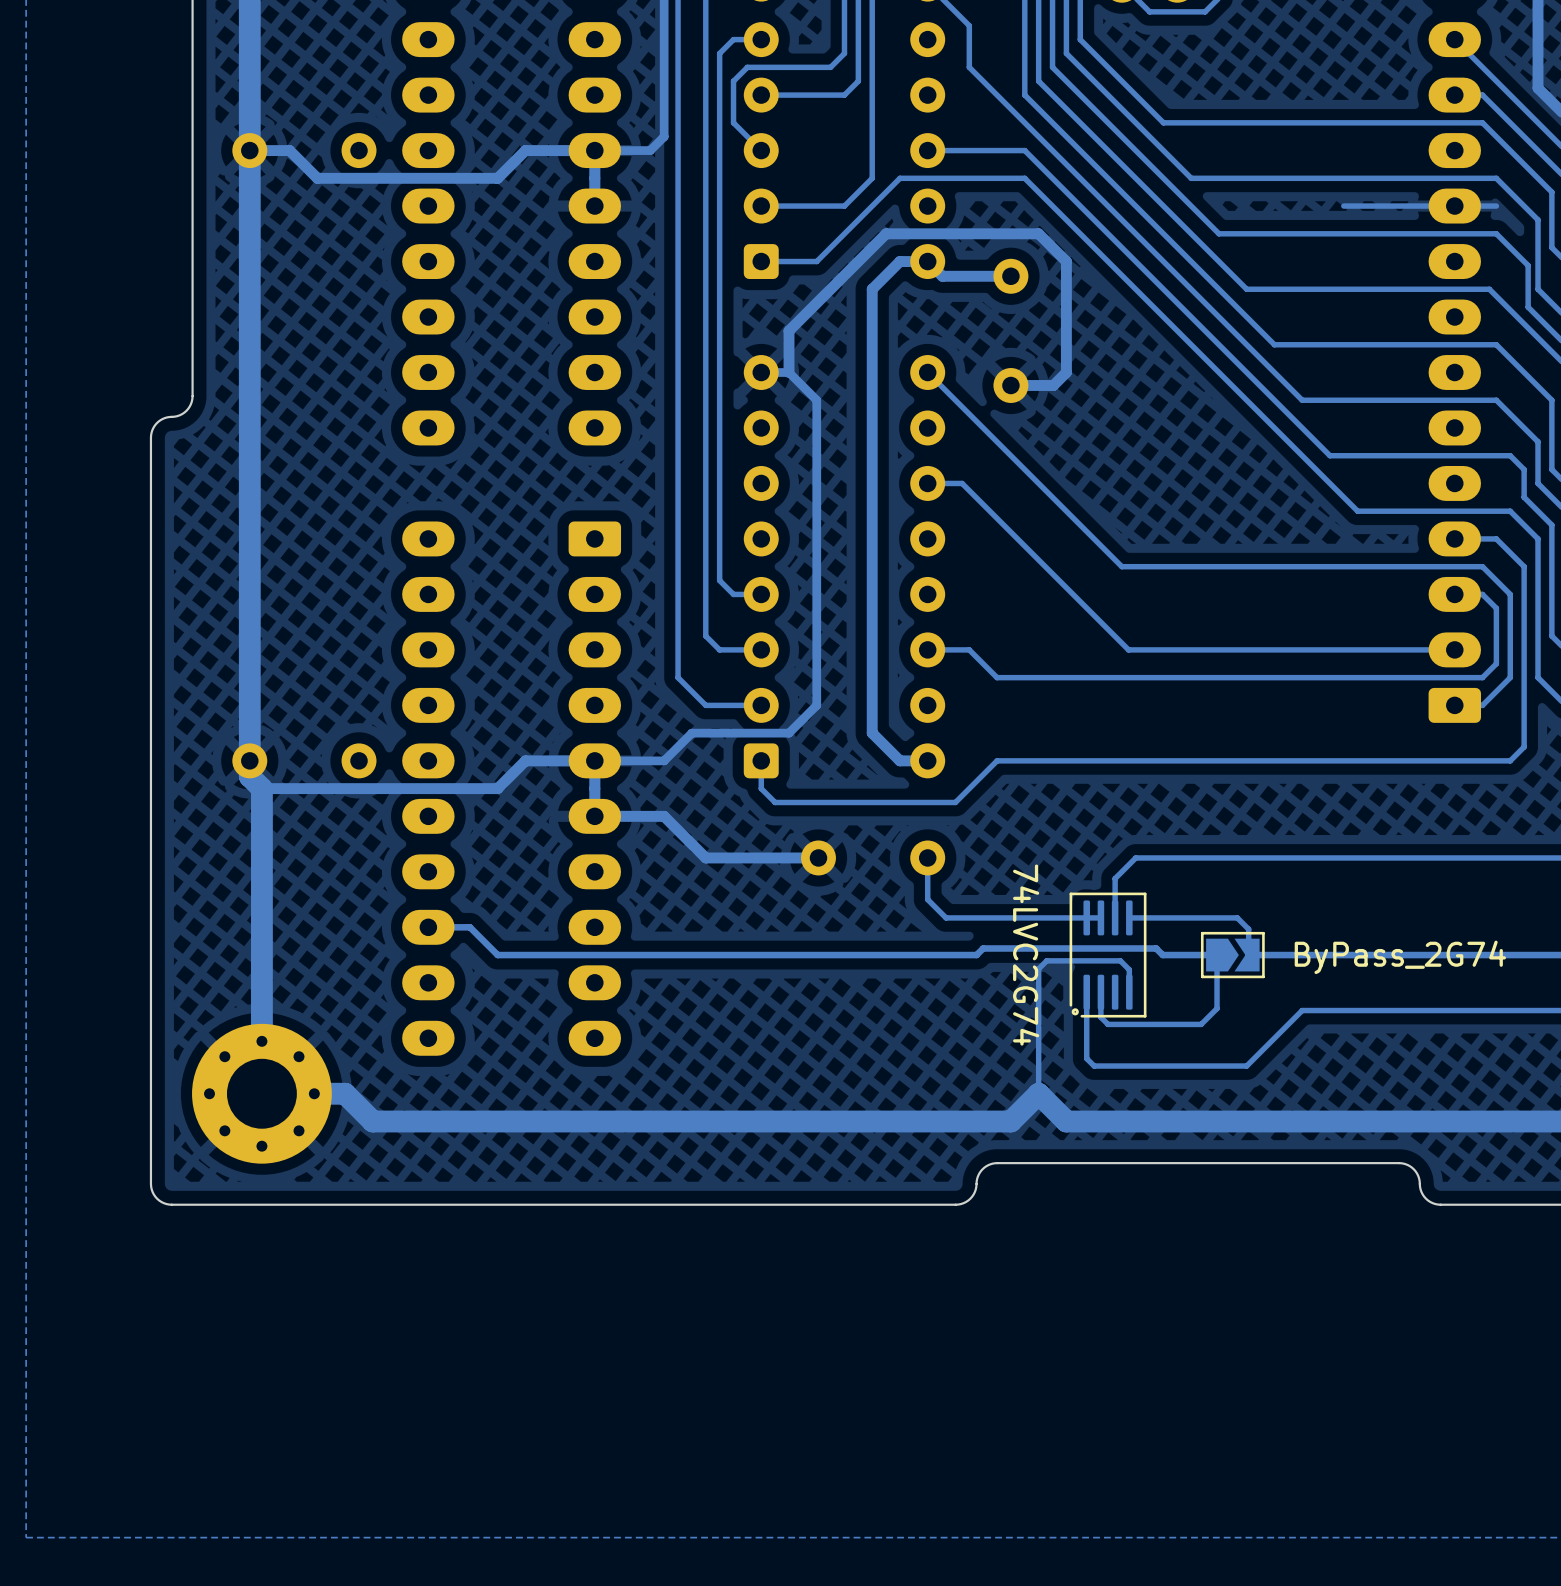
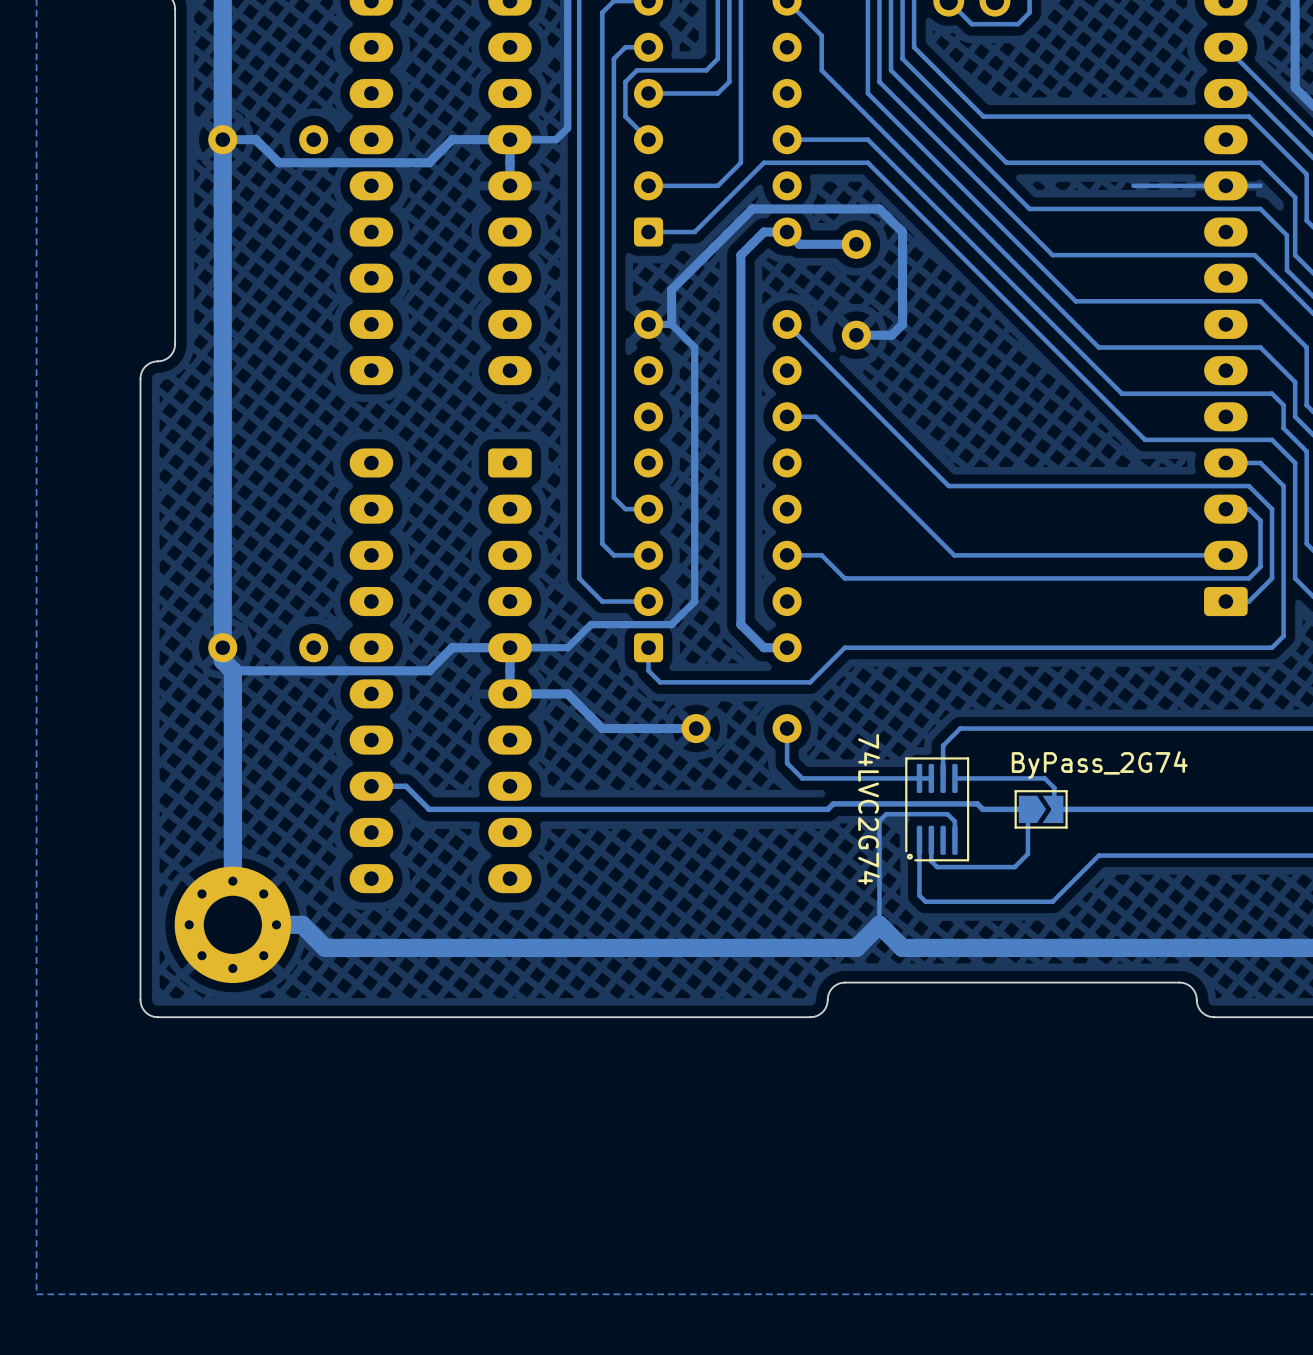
ByPass_2G74 name position: ByPass_2G74 (1400, 957) -> ByPass_2G74 (1099, 765)

